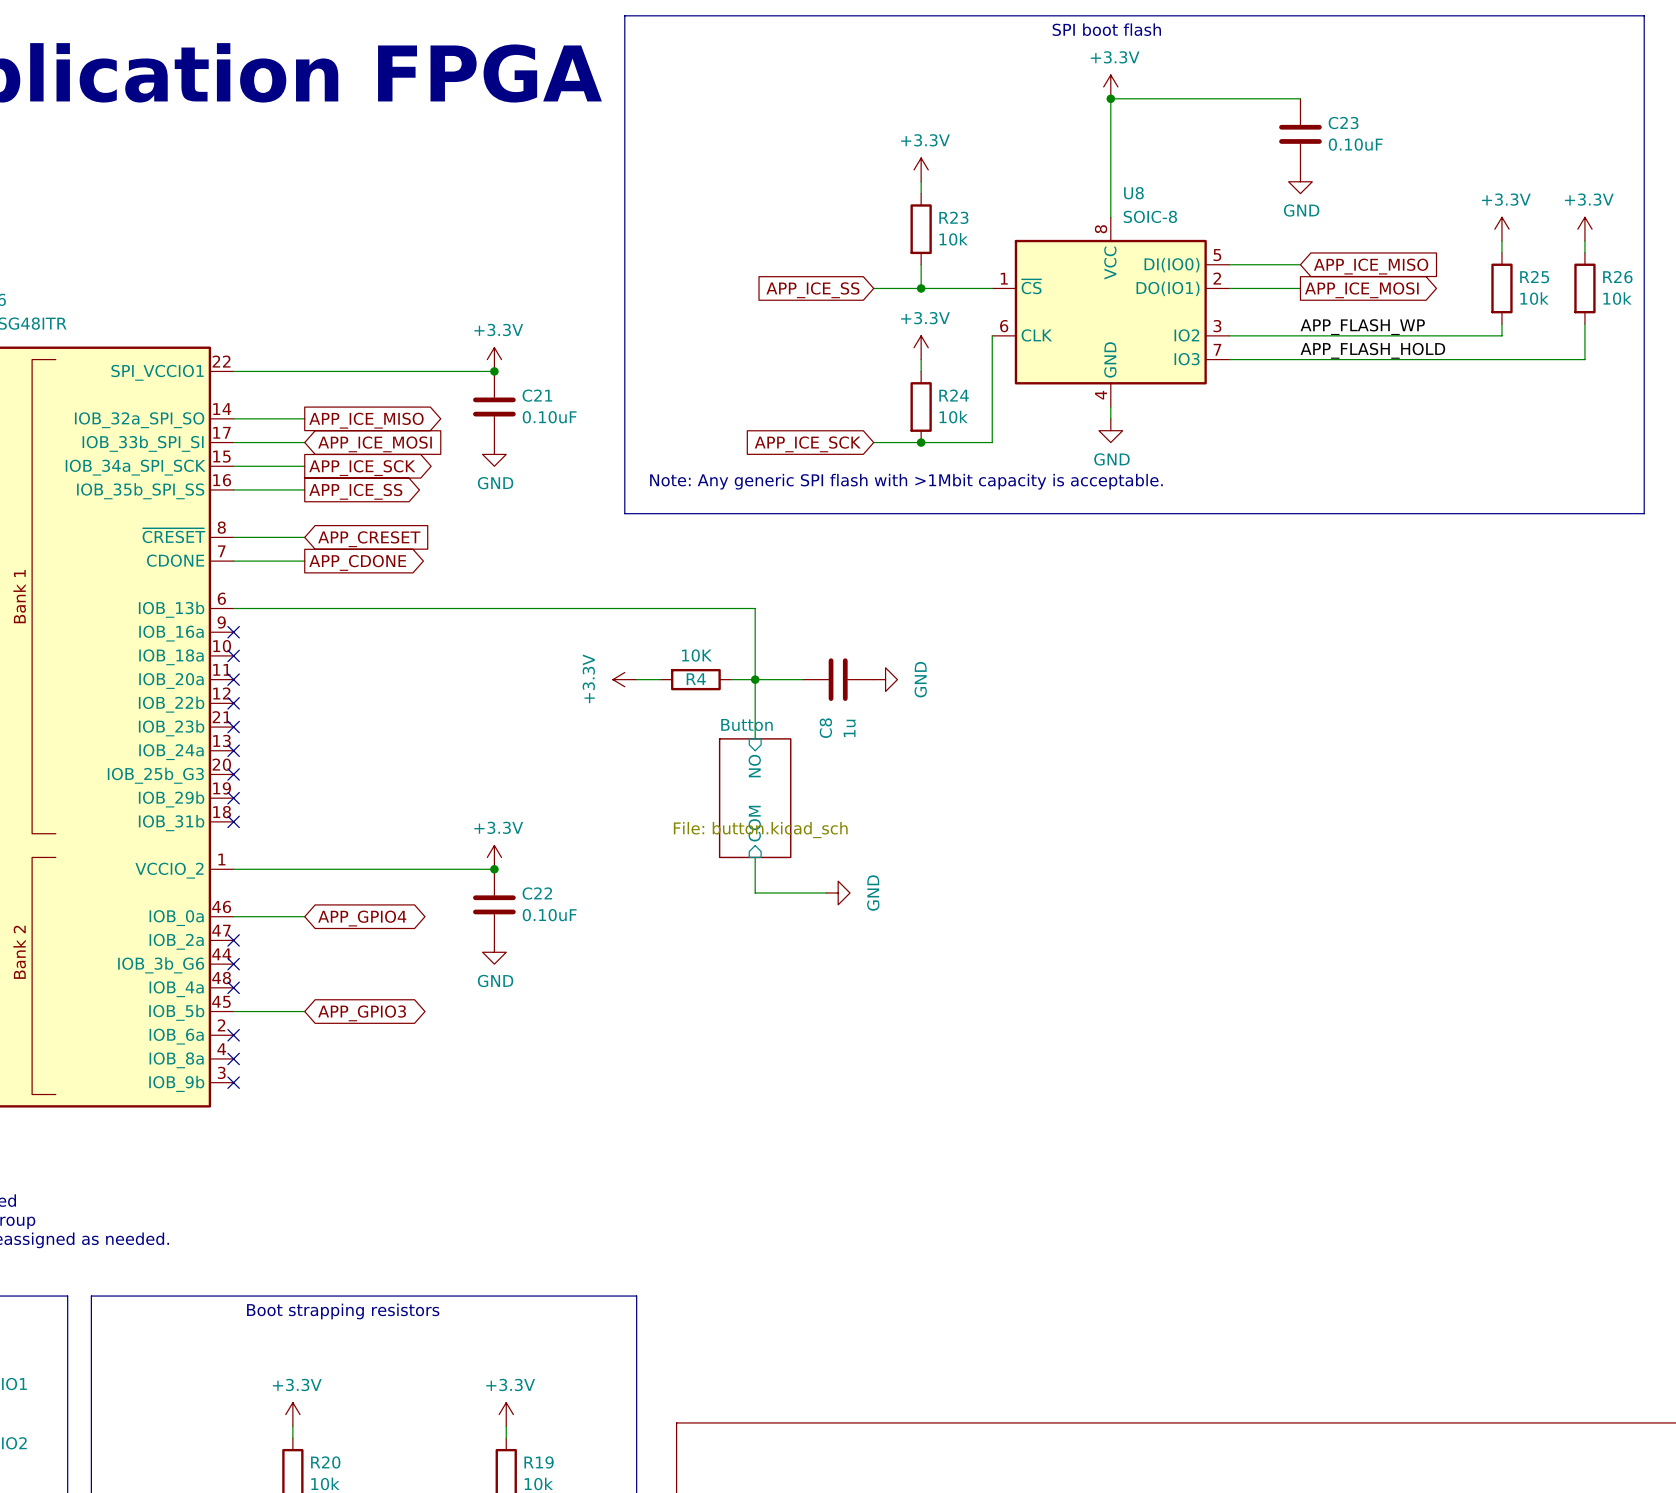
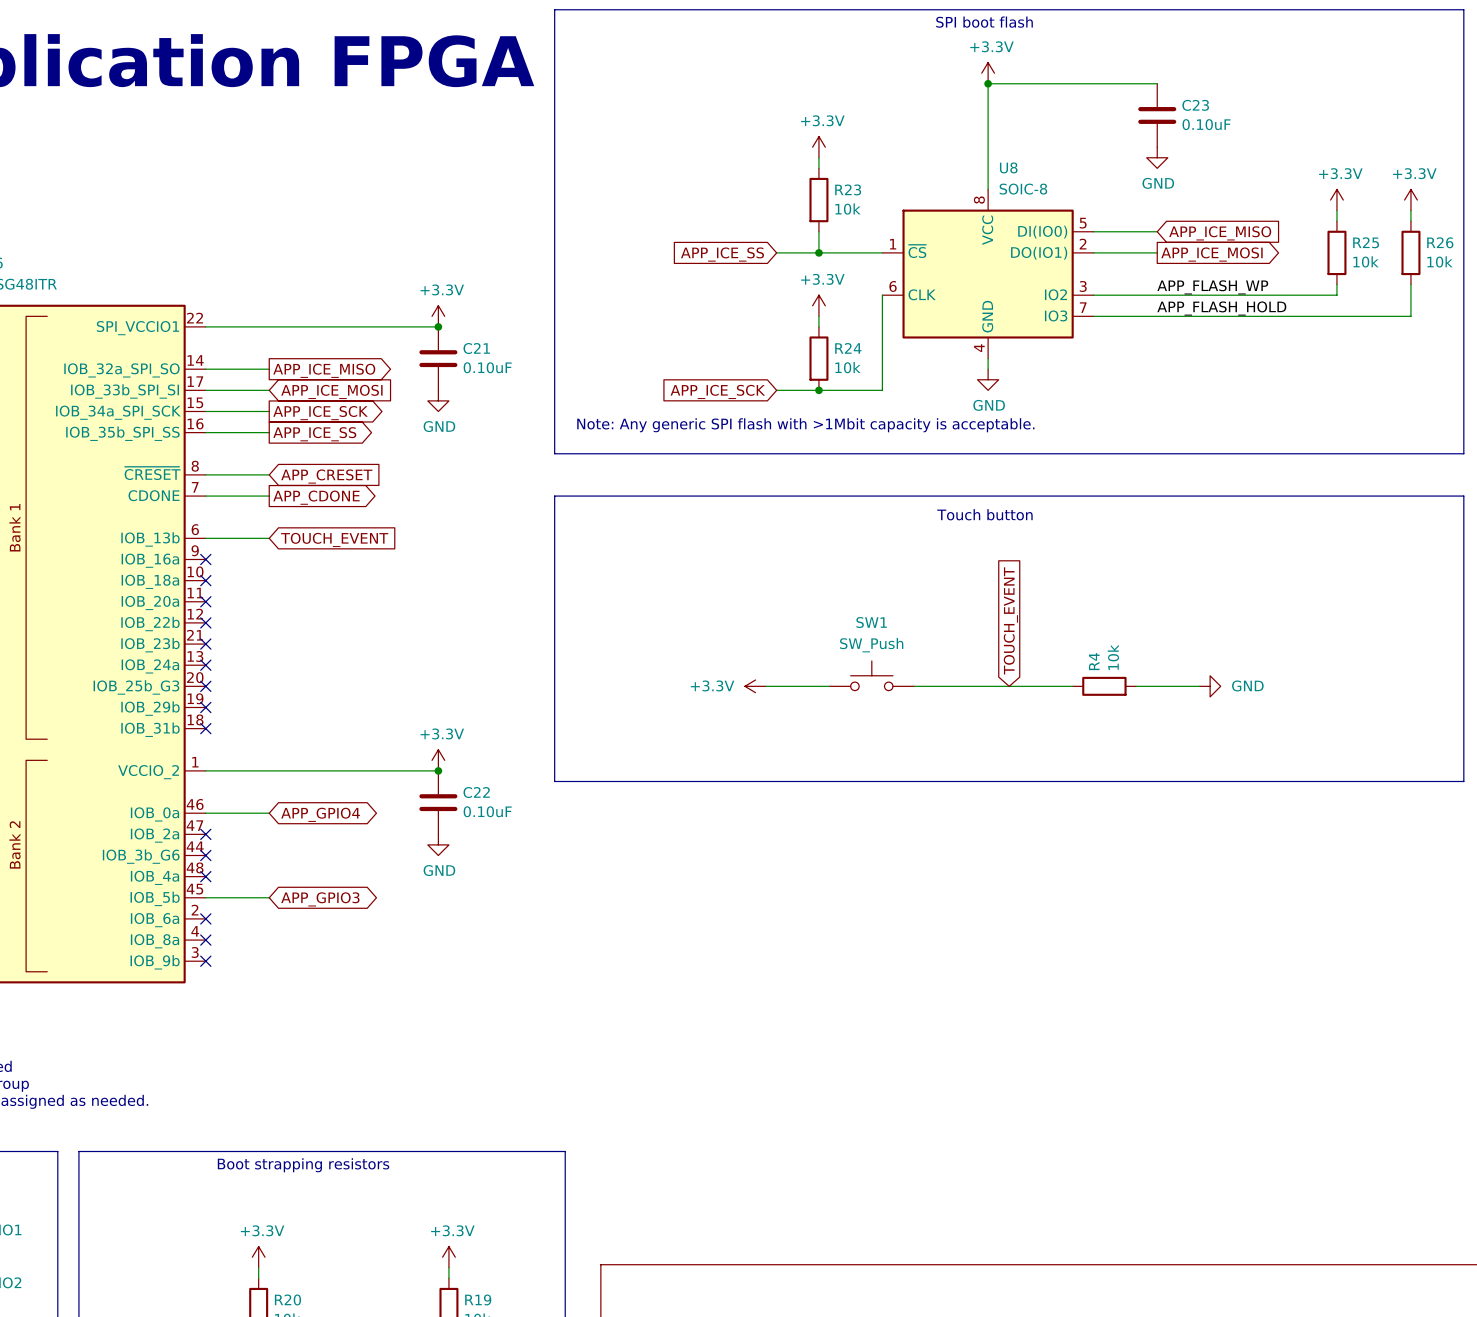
line: none -> (554, 496) (1463, 496) (1463, 781) (554, 781) (554, 496)
text: none -> Touch button (984, 514)
wire: (304, 608) (755, 608) (755, 738) -> none
global label: none -> TOUCH_EVENT (334, 539)
R4 value: 10K (696, 655) -> 10k (1113, 657)
power symbol: +3.3V (624, 679) -> none
wire: (636, 679) (660, 679) -> none
R4 position: (695, 679) -> (1104, 686)
R4 name rotation: 0° (696, 679) -> 90° counterclockwise (1094, 661)
R4 name position: R4 (696, 679) -> R4 (1094, 661)
wire: (731, 679) (802, 679) -> (766, 686) (829, 686)
junction: (755, 679) -> none
C8: 1u (838, 679) -> none
power symbol: GND (885, 679) -> none
global label: none -> TOUCH_EVENT (1010, 620)
SW1: none -> SW_Push (871, 675)
sheet pin: NO (754, 766) -> none
power symbol: none -> +3.3V (755, 686)
wire: none -> (914, 686) (1072, 686)
wire: none -> (1136, 686) (1199, 686)
power symbol: none -> GND (1210, 686)
sheet Button: File: button.kicad_sch (755, 798) -> none
sheet pin: COM (754, 823) -> none
wire: (755, 857) (755, 893) (826, 893) -> none
power symbol: GND (838, 893) -> none

